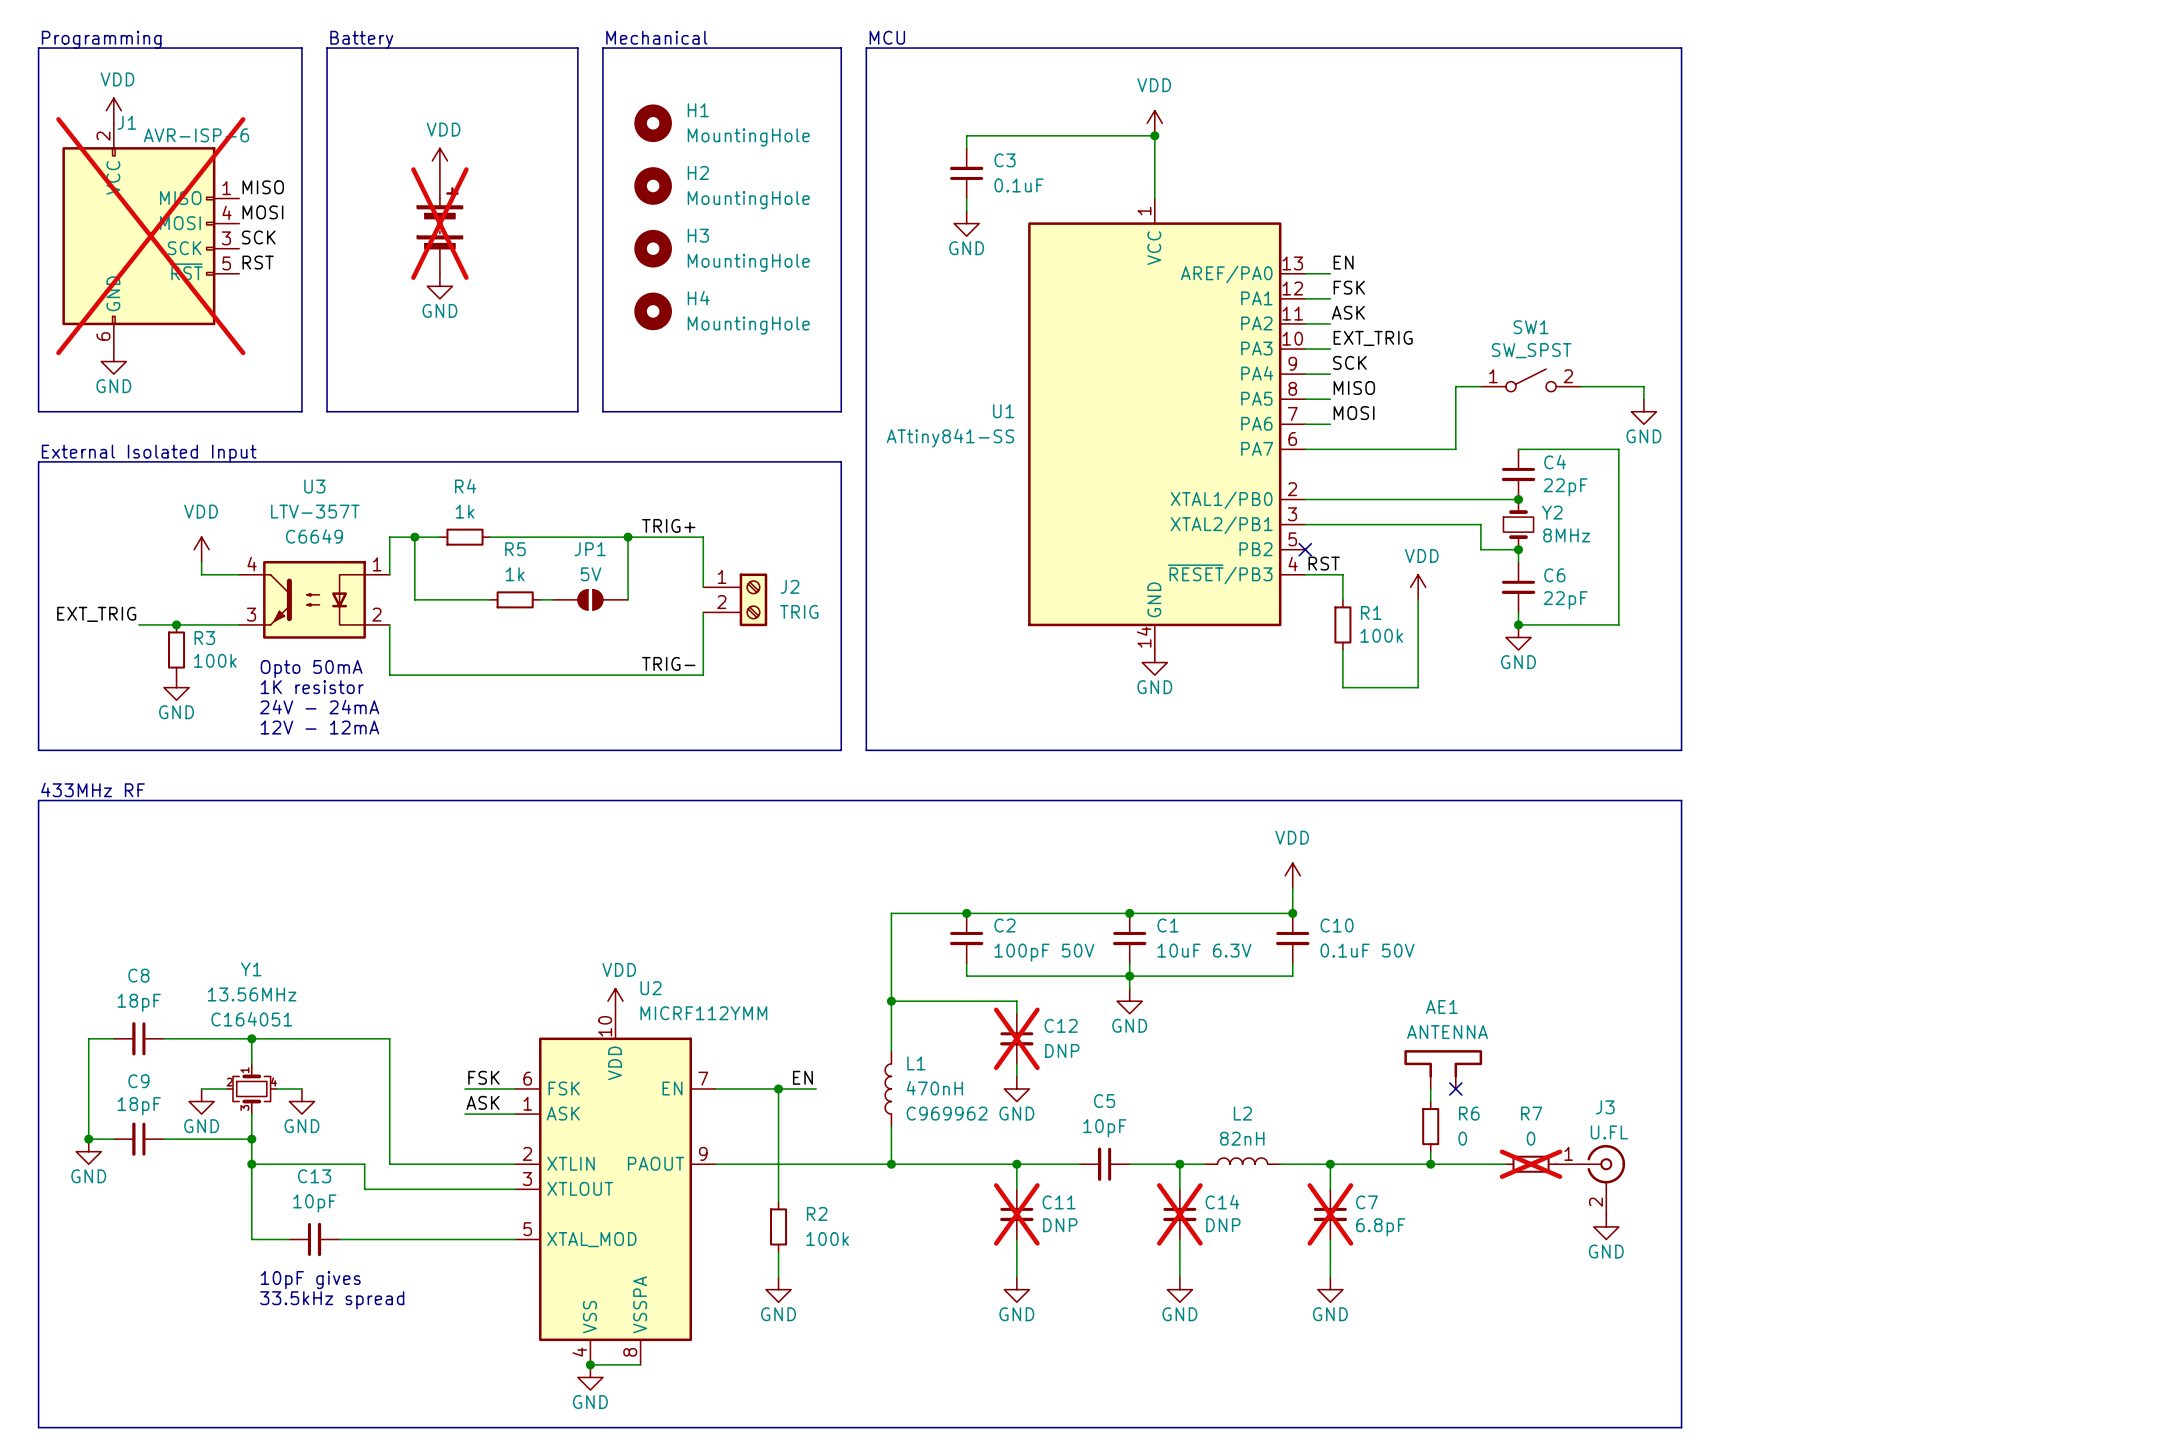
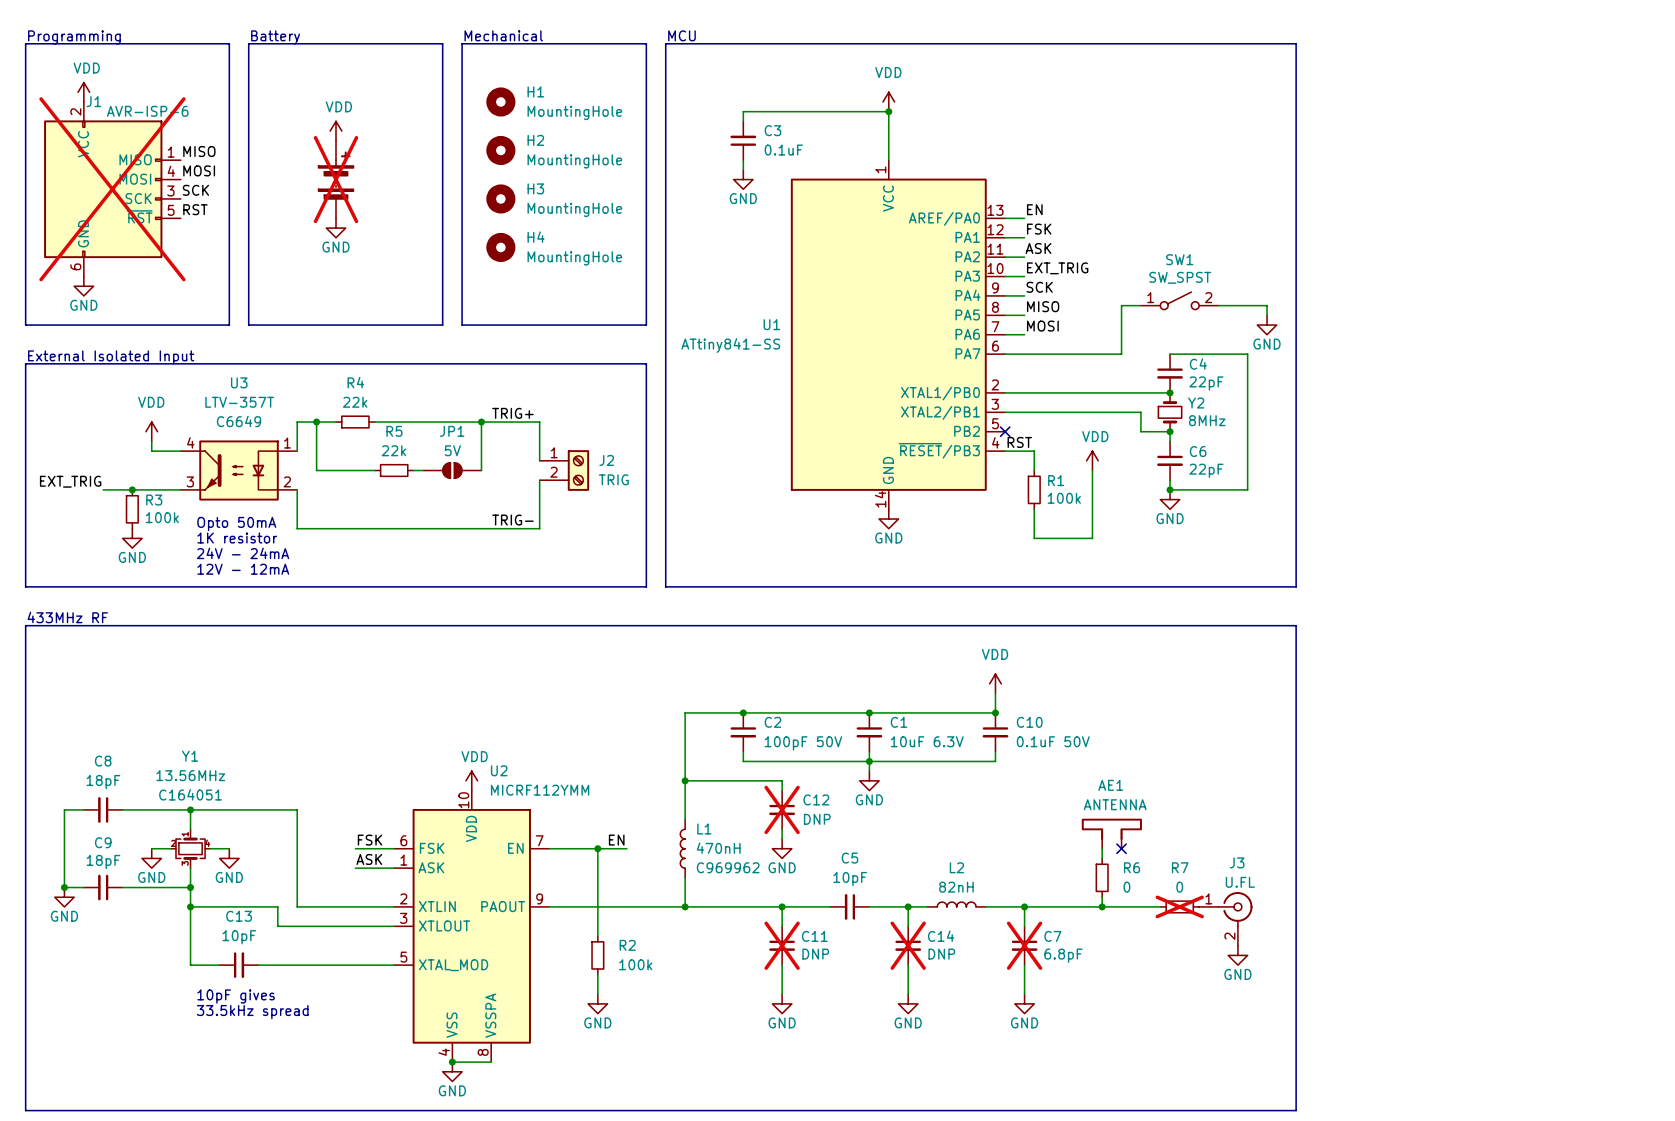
R4 value: 1k (464, 511) -> 22k (355, 402)
R5 value: 1k (515, 574) -> 22k (393, 450)

